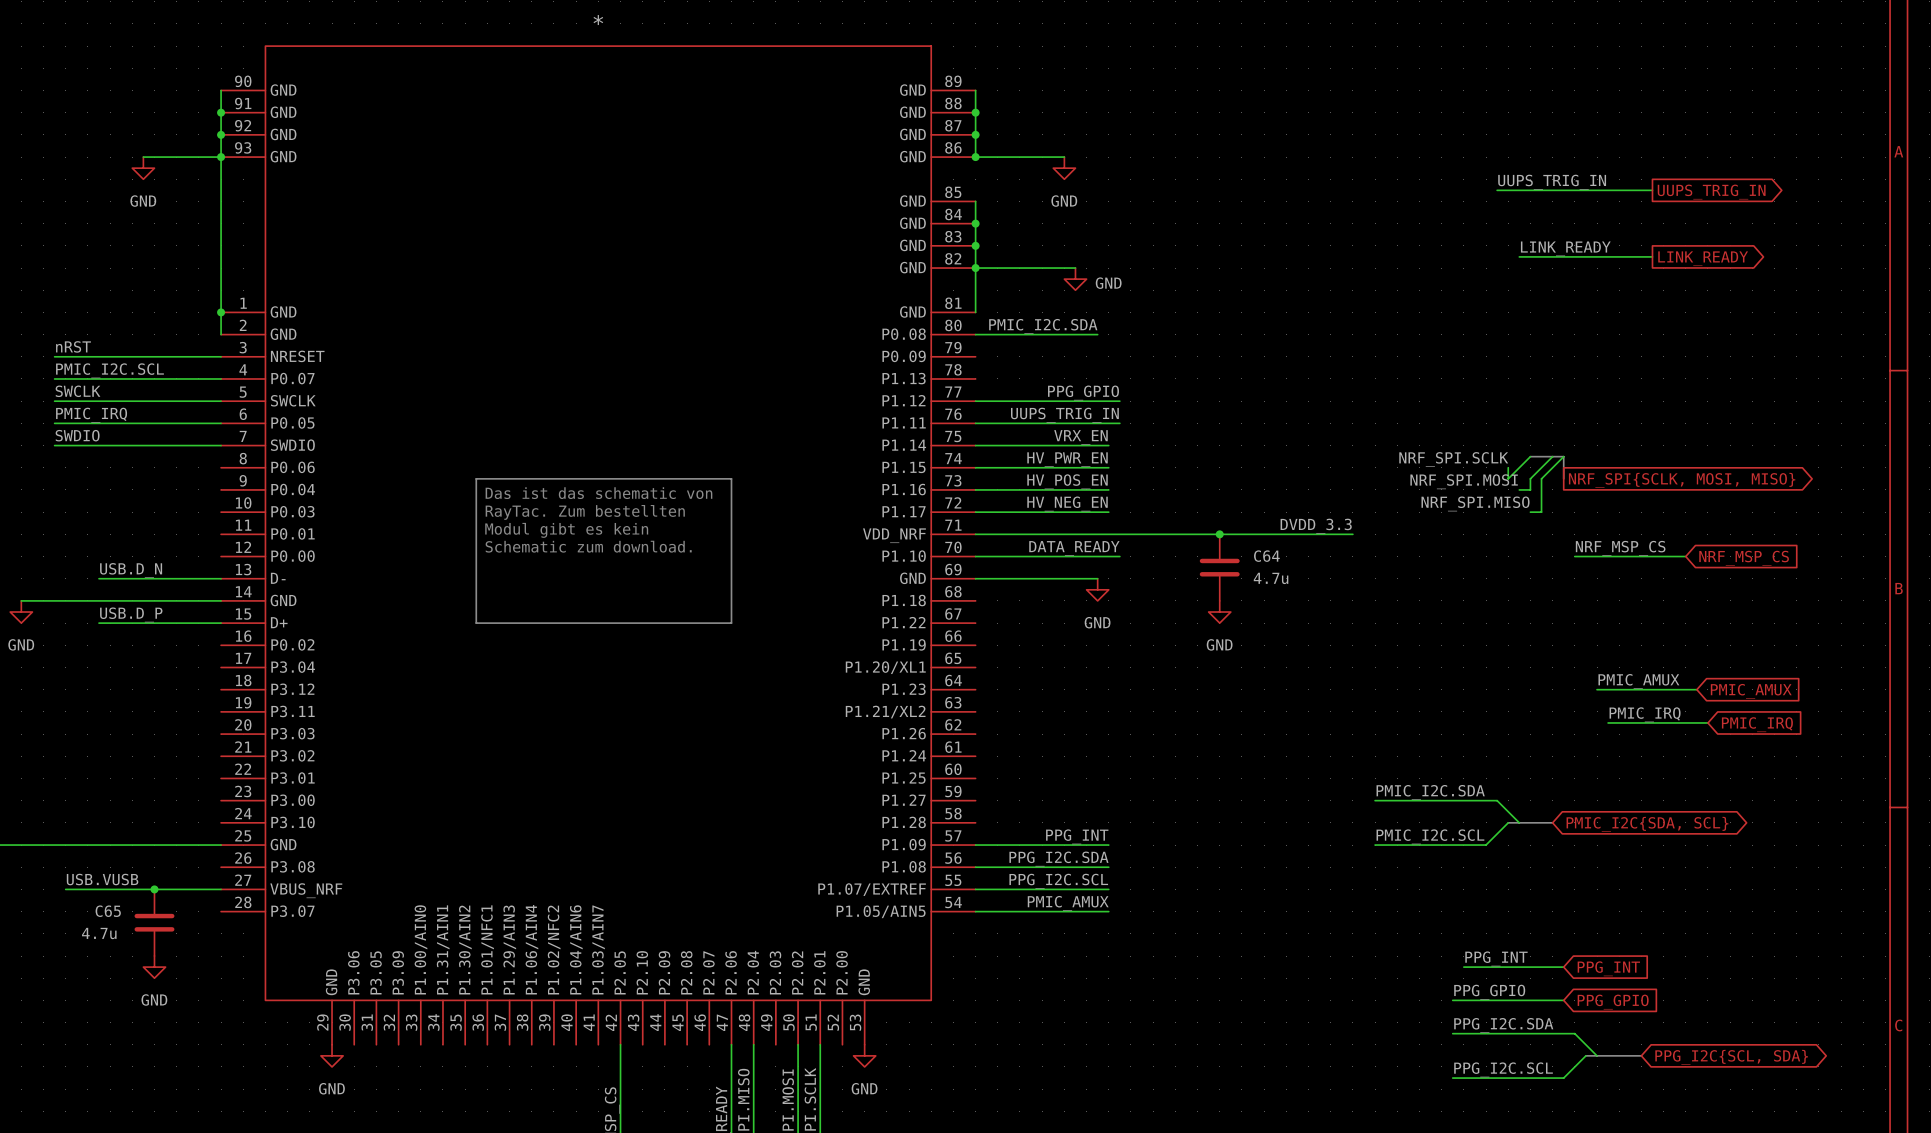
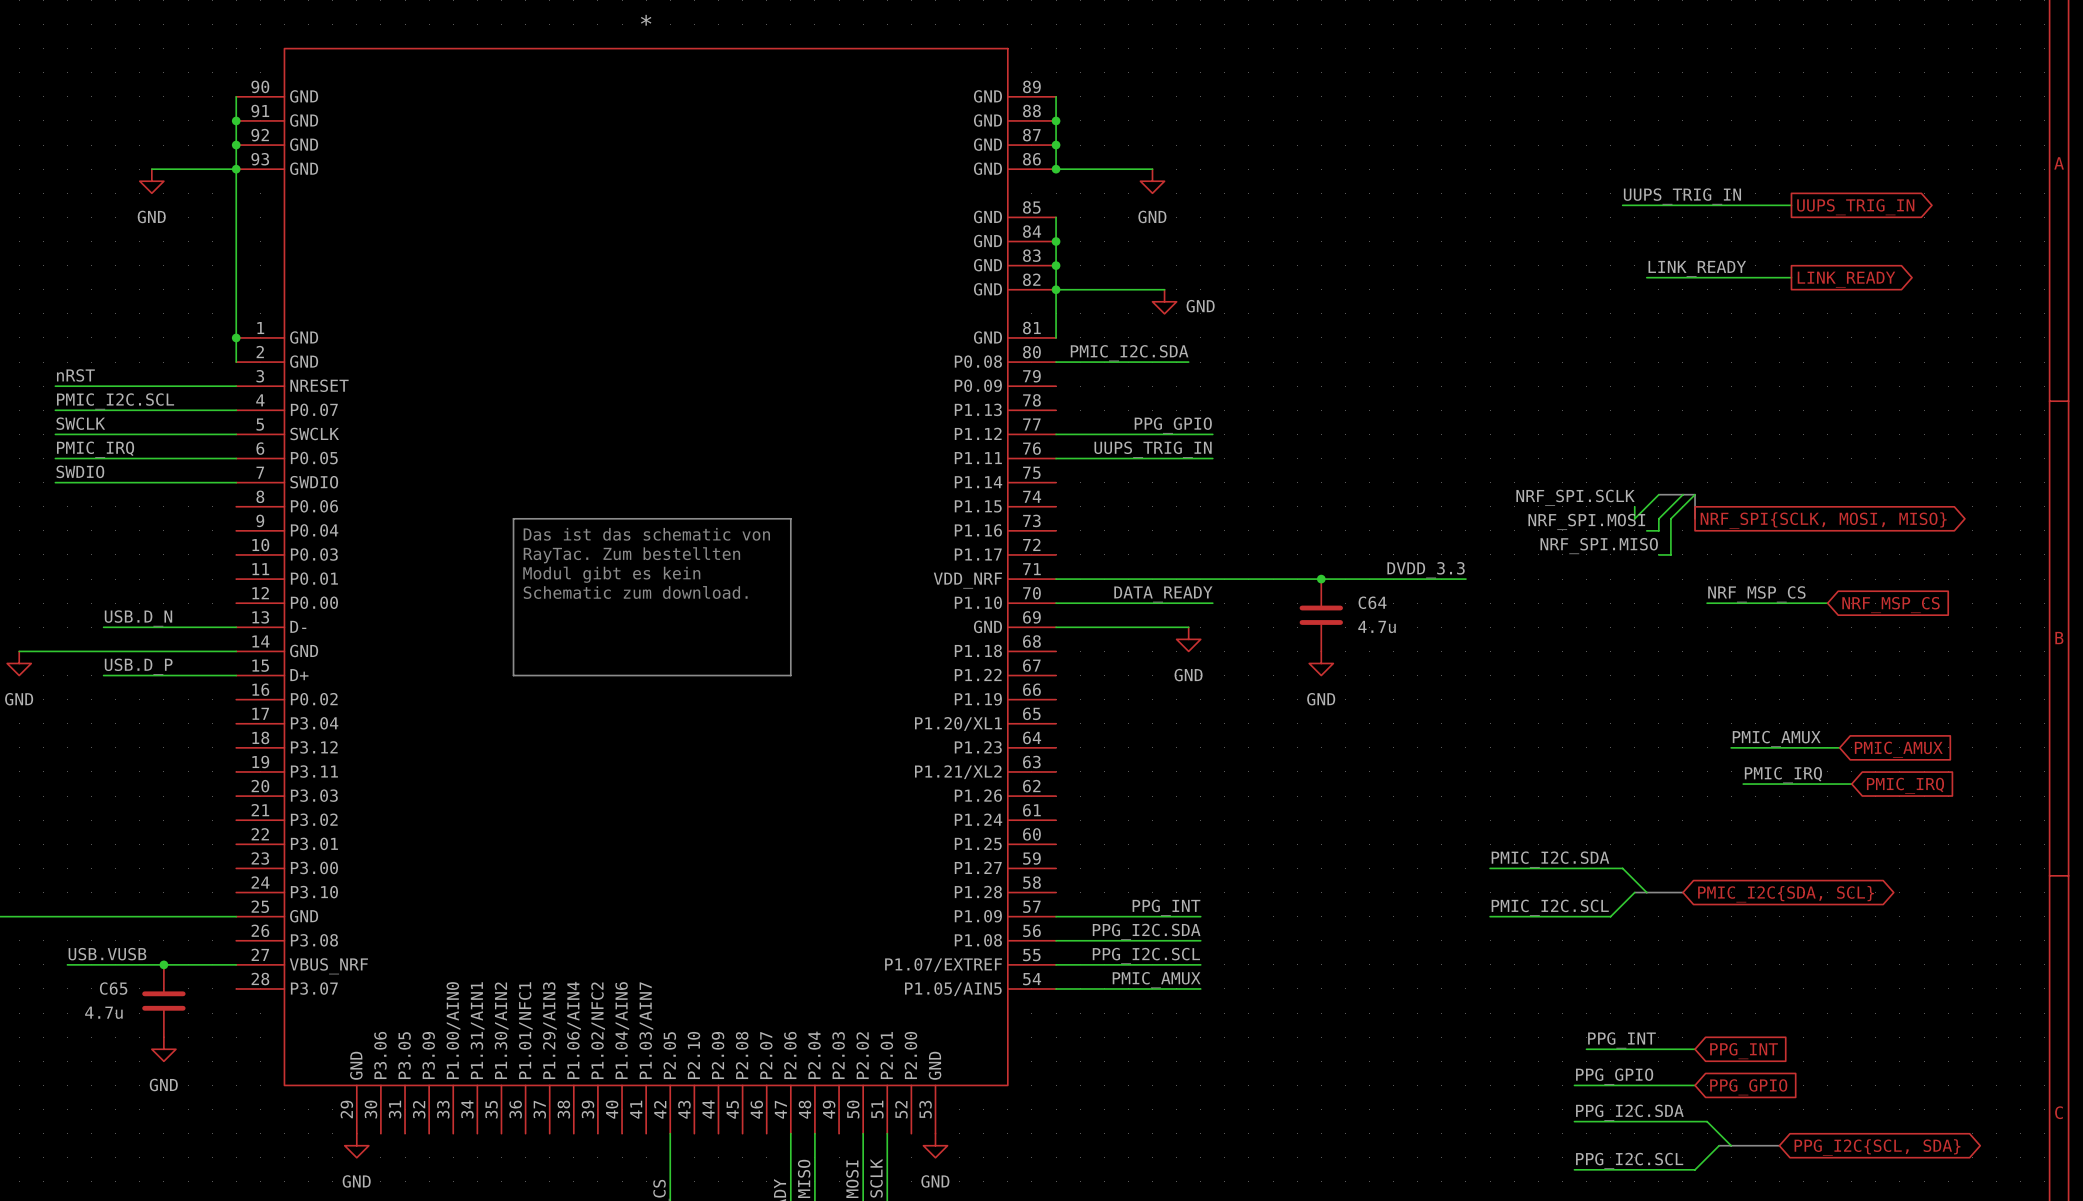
label: VRX_EN (1080, 437) -> none
wire: (975, 445) (1108, 445) -> none
label: HV_PWR_EN (1067, 459) -> none
wire: (975, 467) (1108, 467) -> none
label: HV_POS_EN (1067, 481) -> none
wire: (975, 489) (1108, 489) -> none
label: HV_NEG_EN (1067, 503) -> none
wire: (975, 512) (1108, 512) -> none

